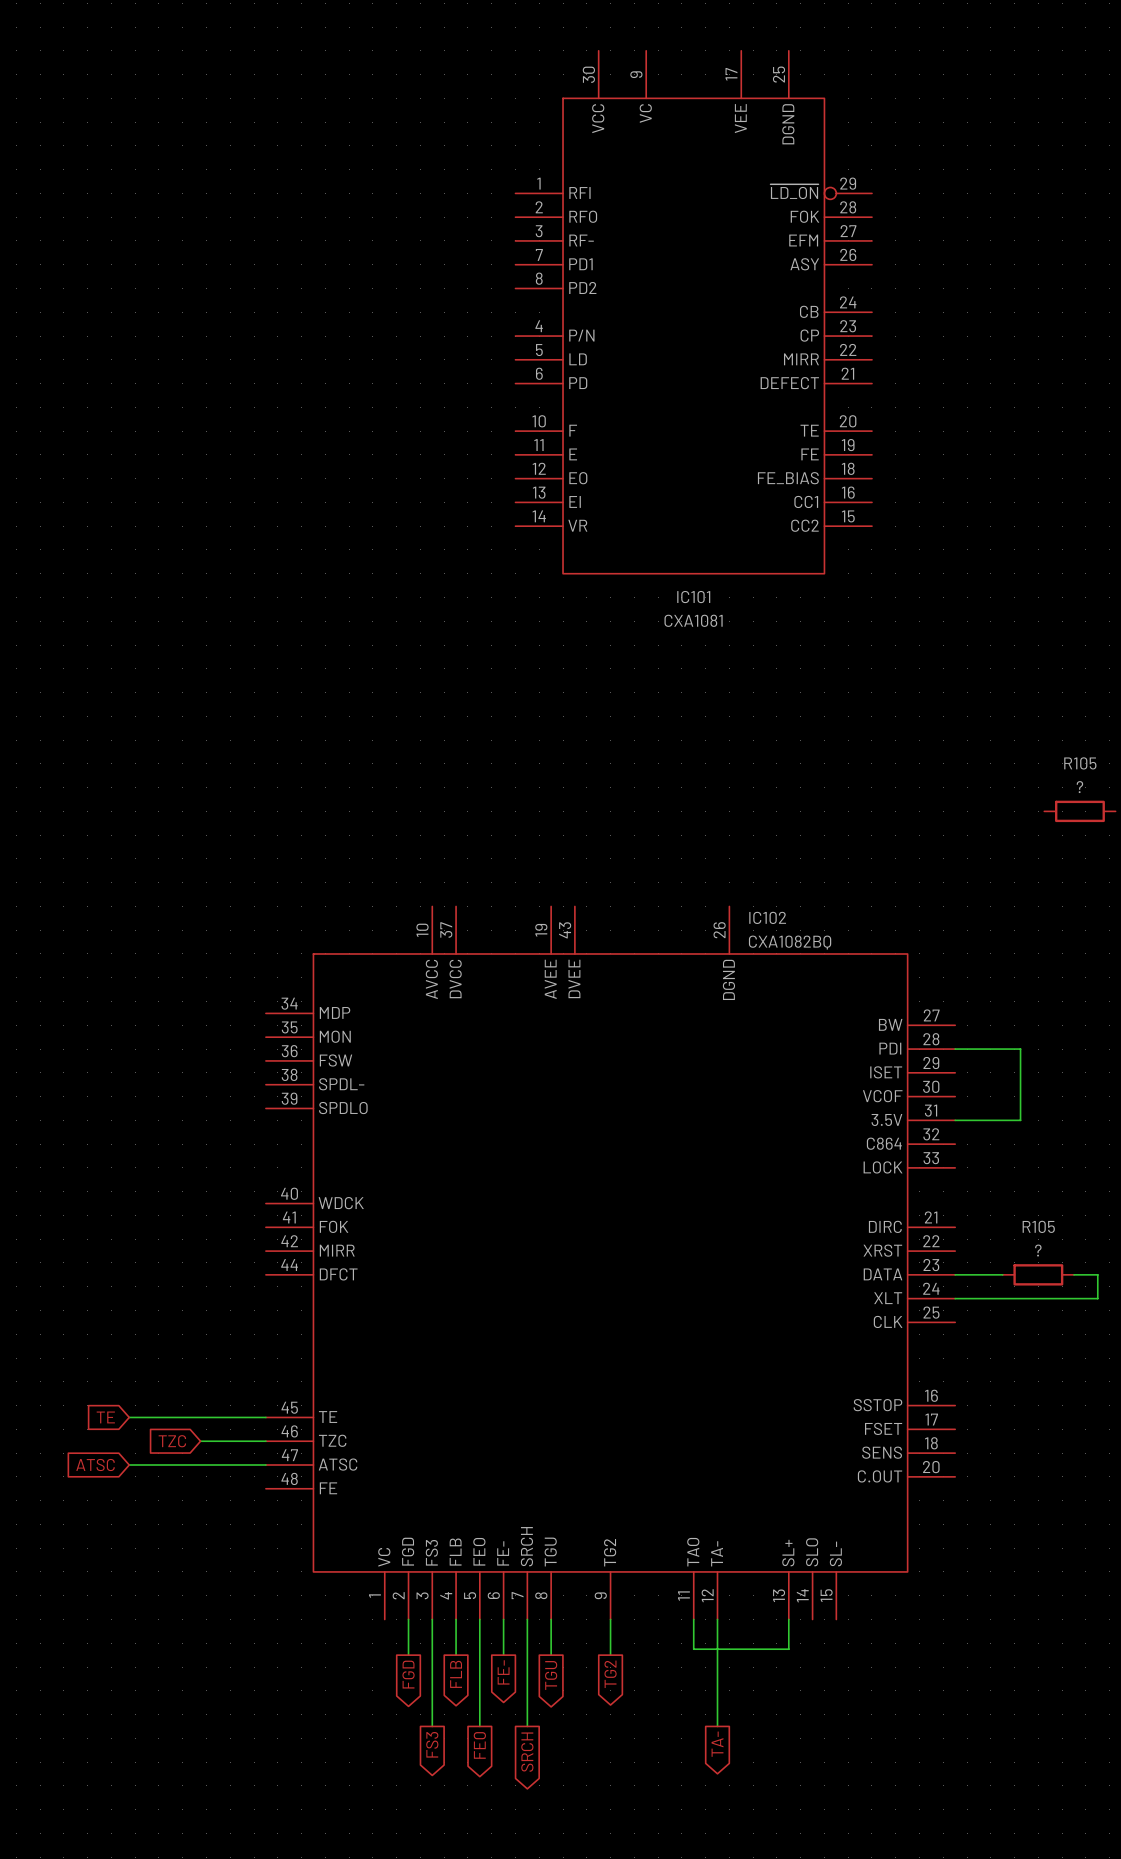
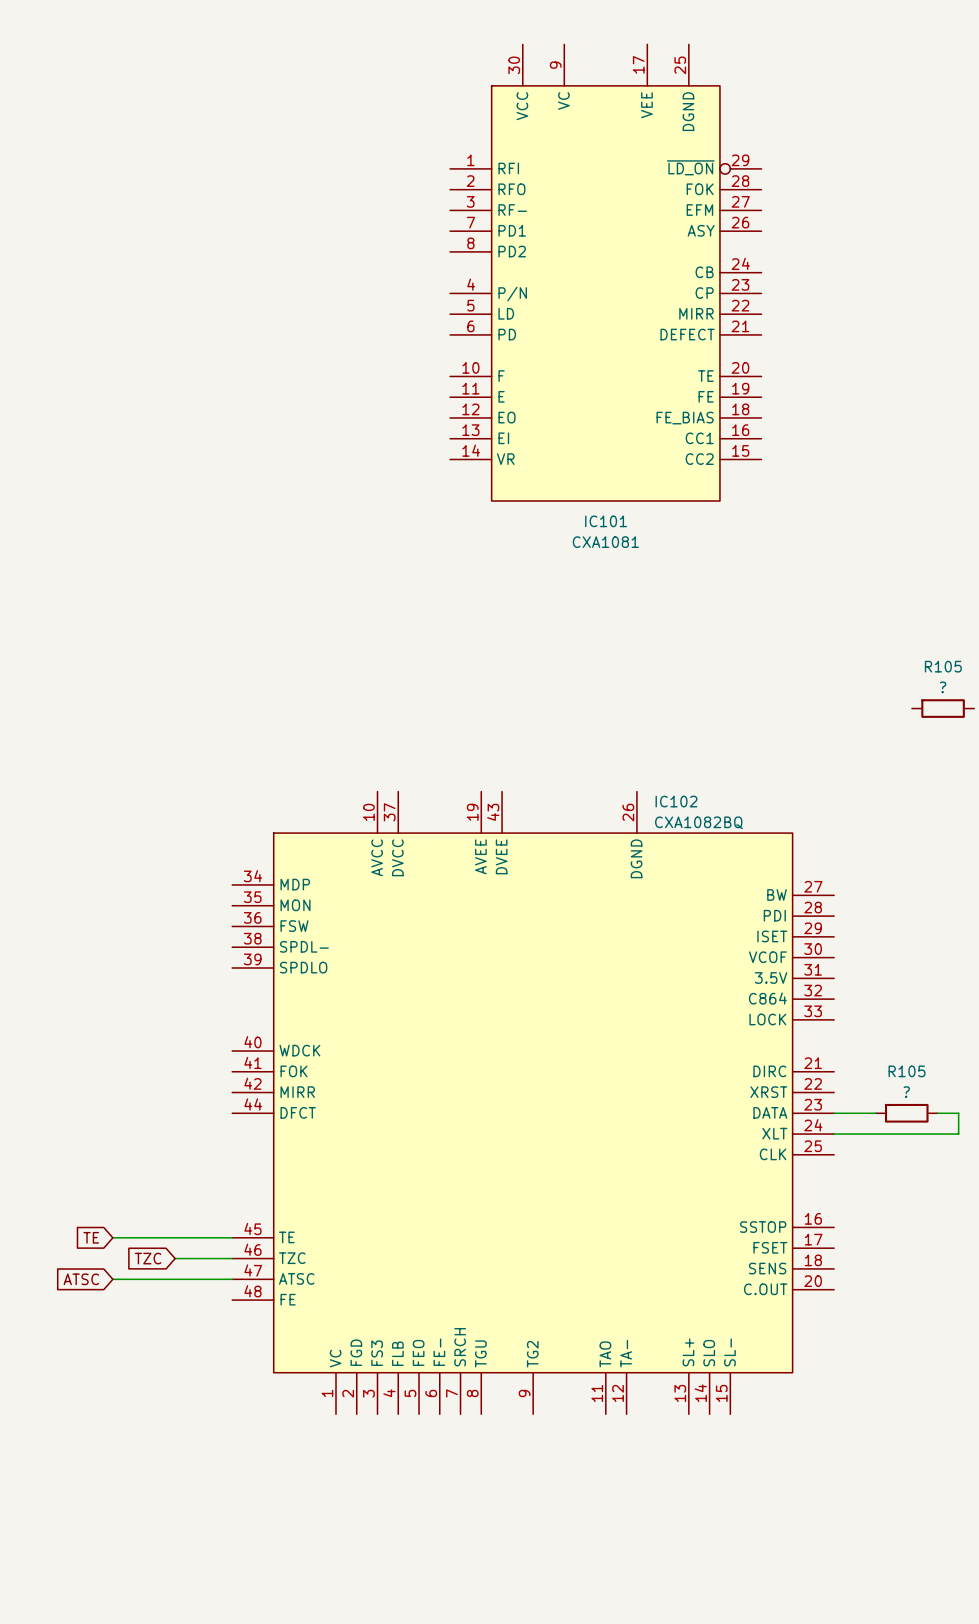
wire: (955, 1049) (1020, 1049) (1020, 1120) (955, 1120) -> none
wire: (408, 1619) (408, 1655) -> none
wire: (432, 1619) (432, 1726) -> none
wire: (456, 1619) (456, 1655) -> none
wire: (479, 1619) (479, 1726) -> none
wire: (503, 1619) (503, 1655) -> none
wire: (527, 1619) (527, 1726) -> none
wire: (551, 1619) (551, 1655) -> none
wire: (610, 1619) (610, 1655) -> none
wire: (693, 1619) (693, 1649) (788, 1649) (788, 1619) -> none
wire: (717, 1619) (717, 1726) -> none
global label: FE- (503, 1672) -> none
global label: FGD (408, 1674) -> none
global label: FLB (456, 1674) -> none
global label: TG2 (610, 1674) -> none
global label: TGU (551, 1675) -> none
global label: FS3 (432, 1744) -> none
global label: TA- (717, 1744) -> none
global label: FE0 (479, 1745) -> none
global label: SRCH (527, 1752) -> none

